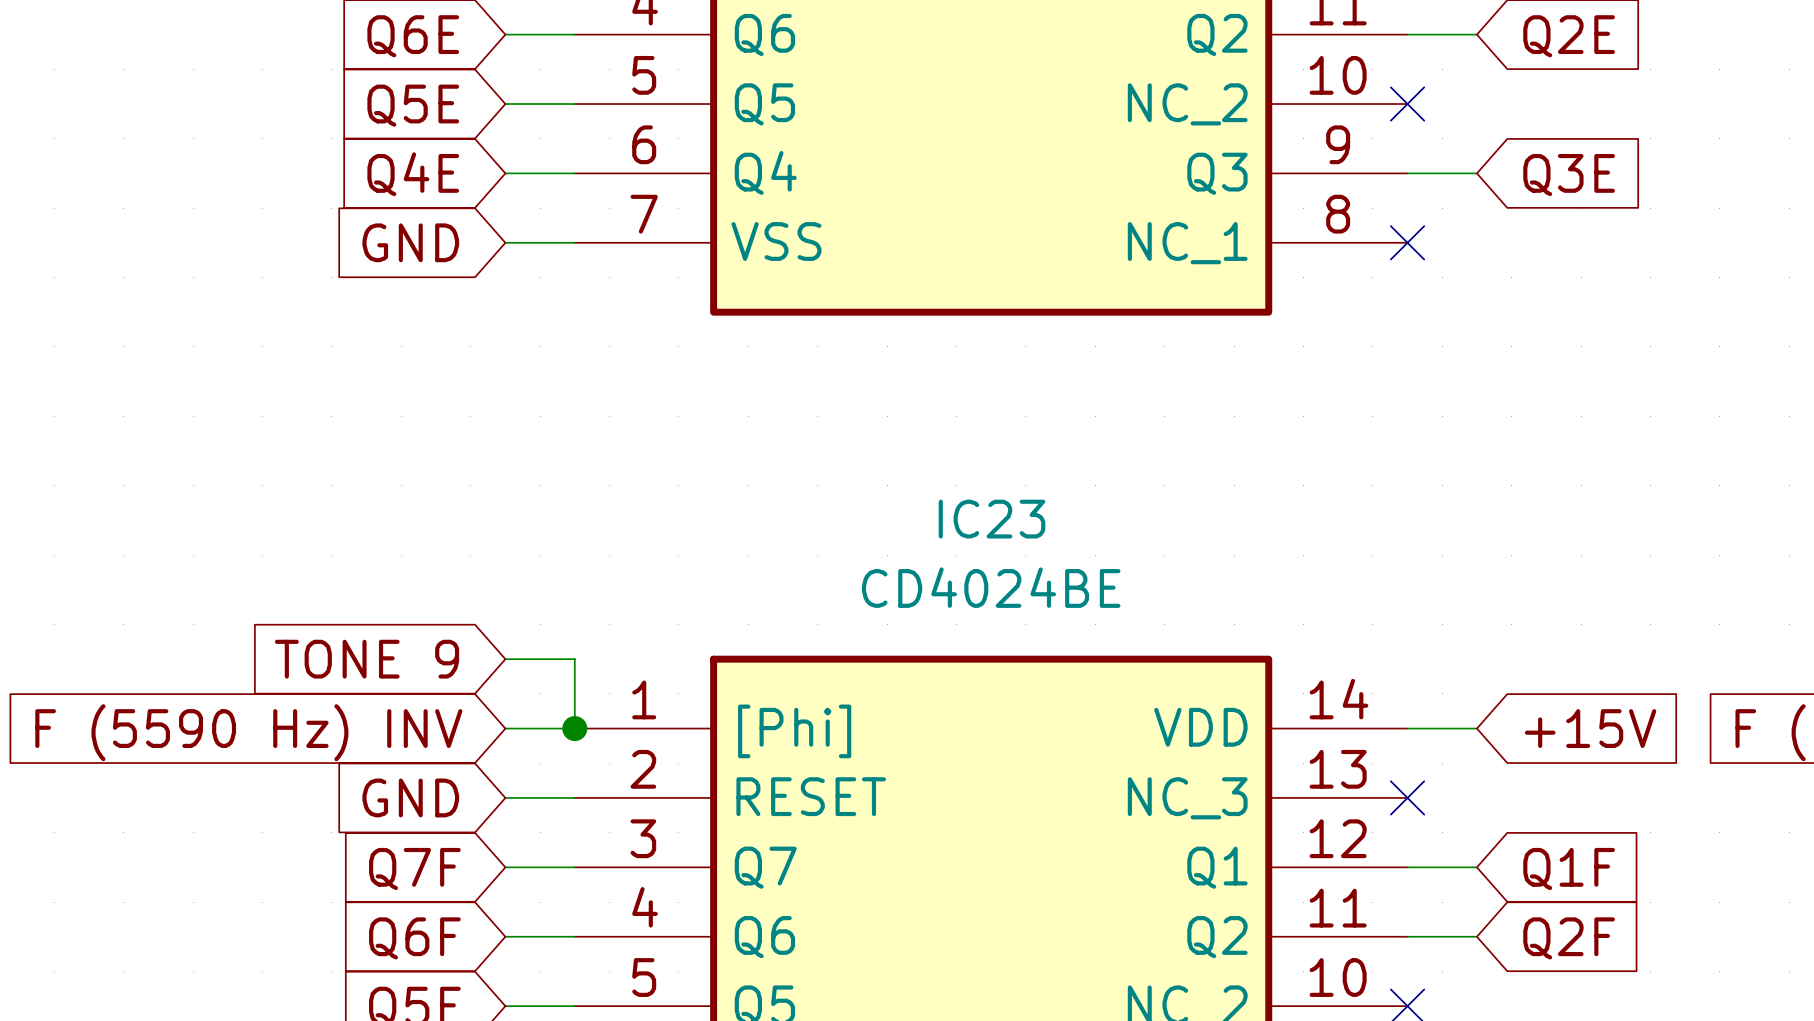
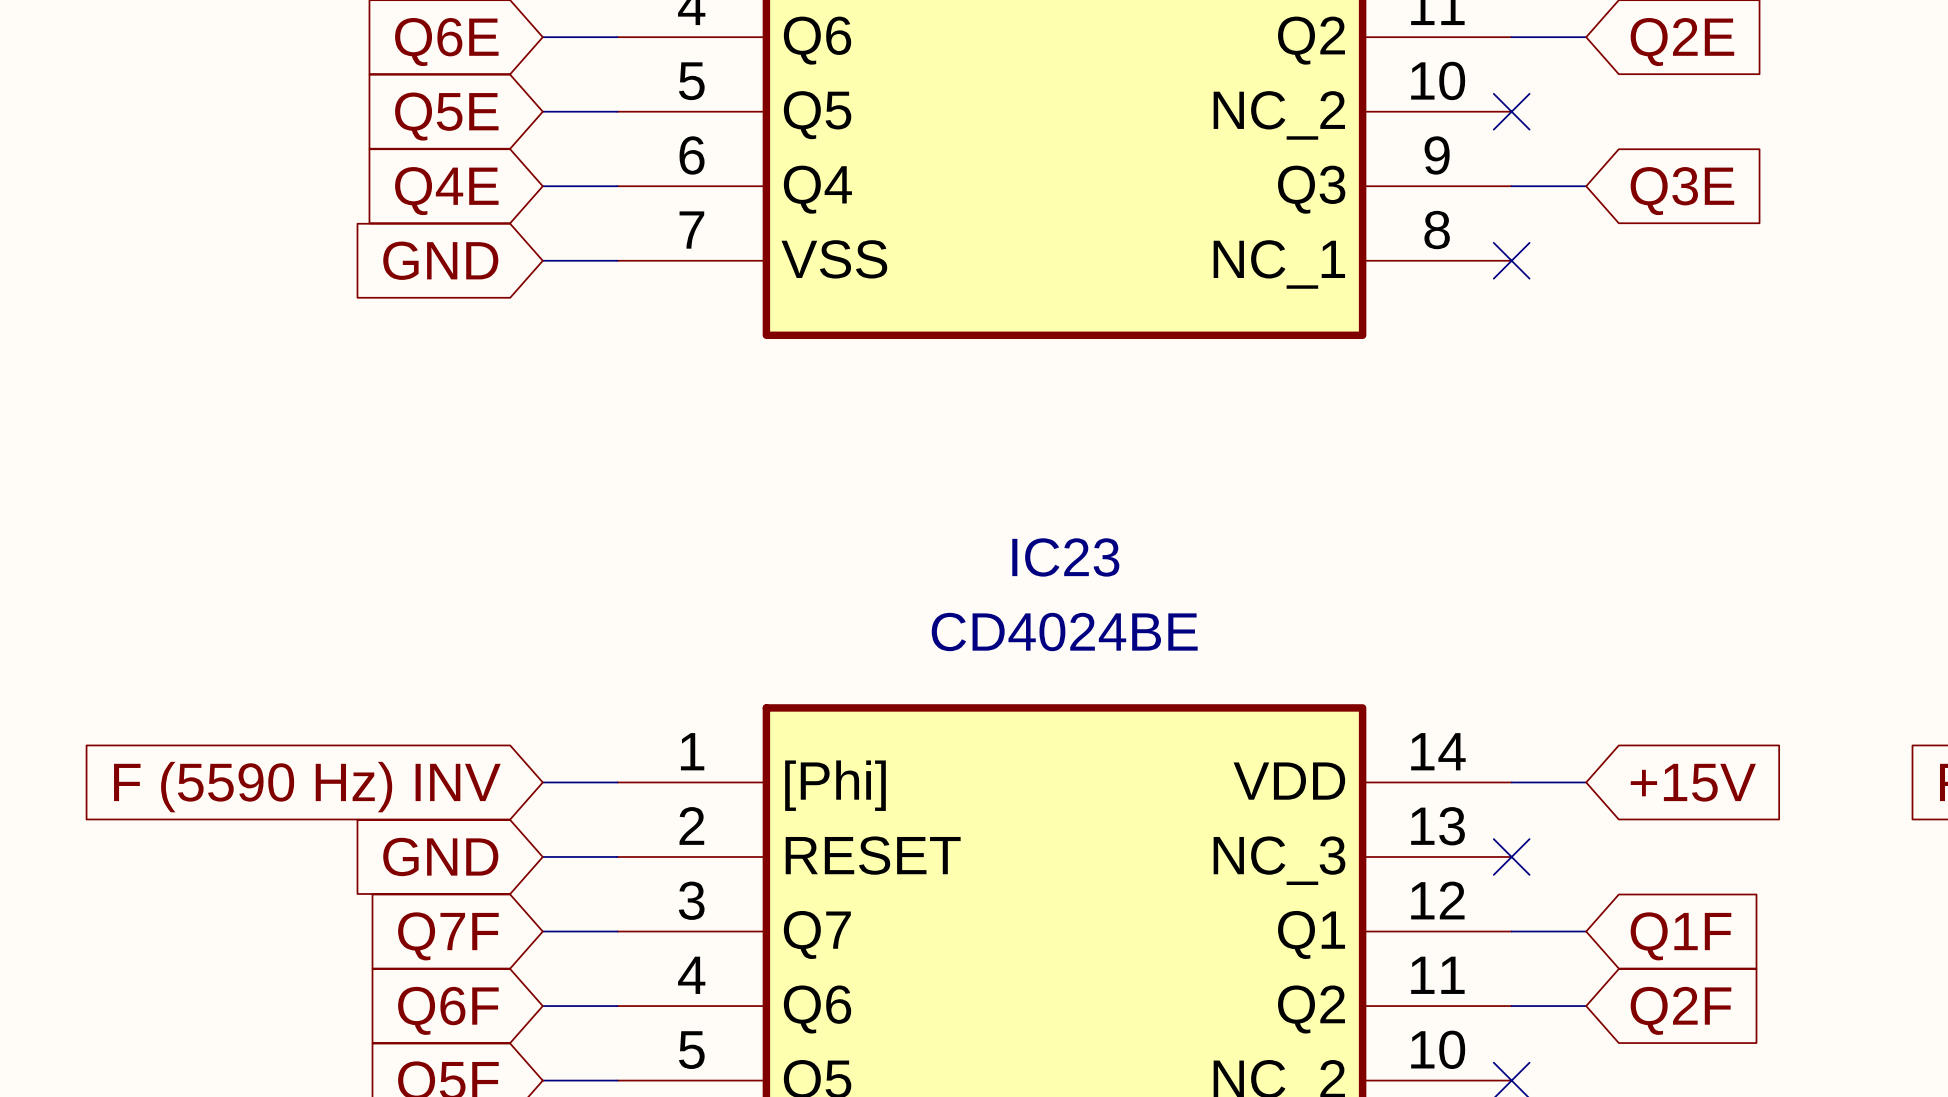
global label: TONE 9 (366, 659) -> none
wire: (505, 659) (574, 659) (574, 728) -> none
junction: (574, 728) -> none

